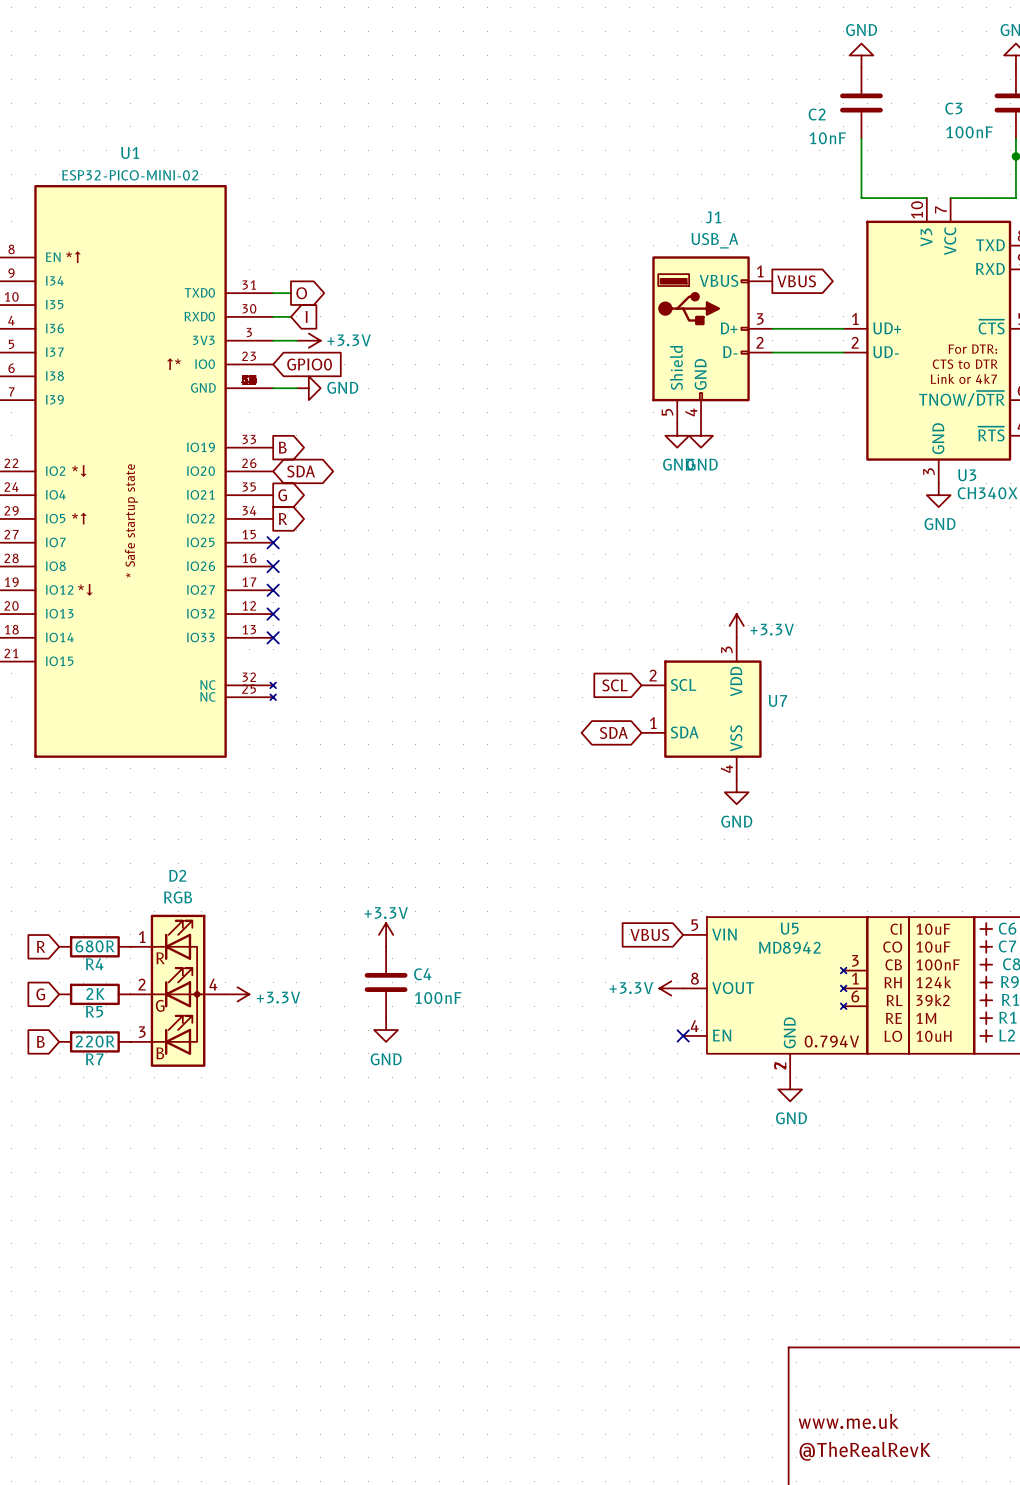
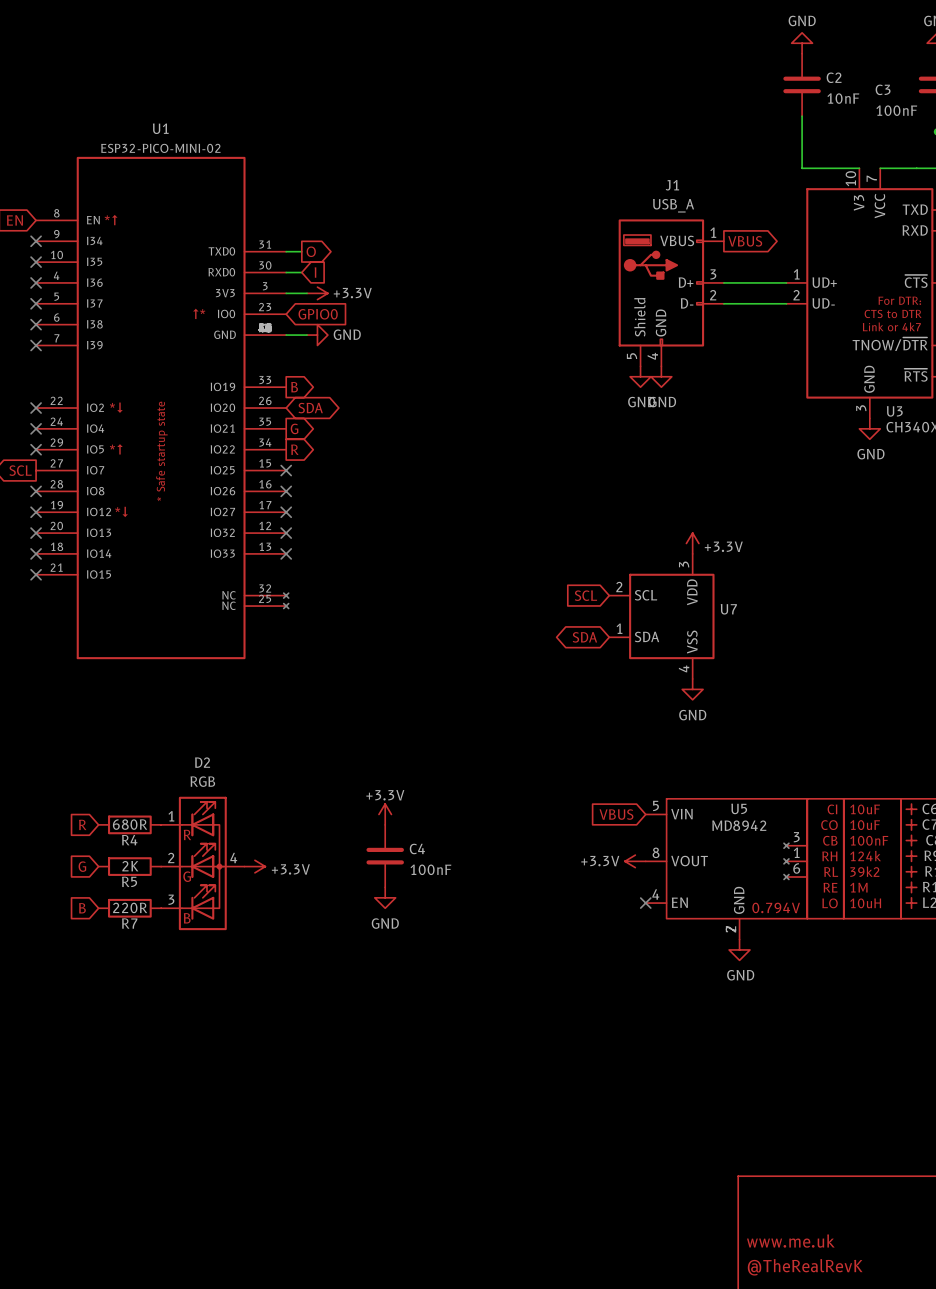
C2 name position: C2 (817, 114) -> C2 (834, 77)
C2 value position: 10nF (827, 138) -> 10nF (843, 98)

